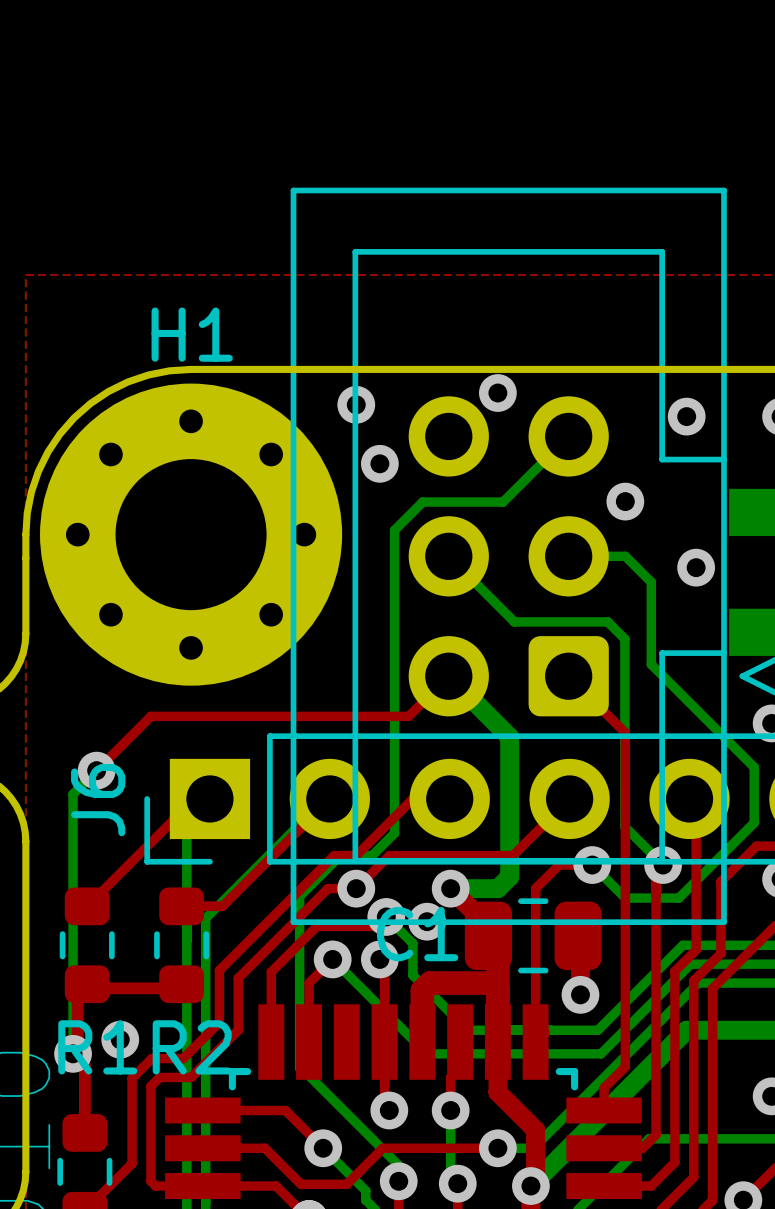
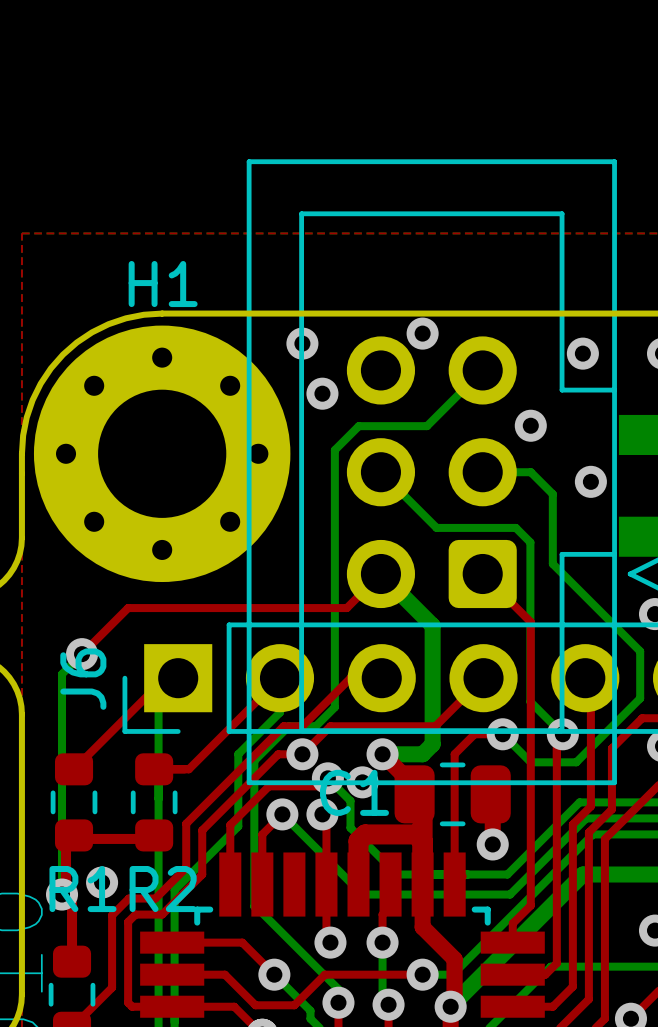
bottom track: (329, 794) (205, 918) (205, 1048) -> (279, 678) (279, 712) (238, 754) (238, 826) (174, 890)

